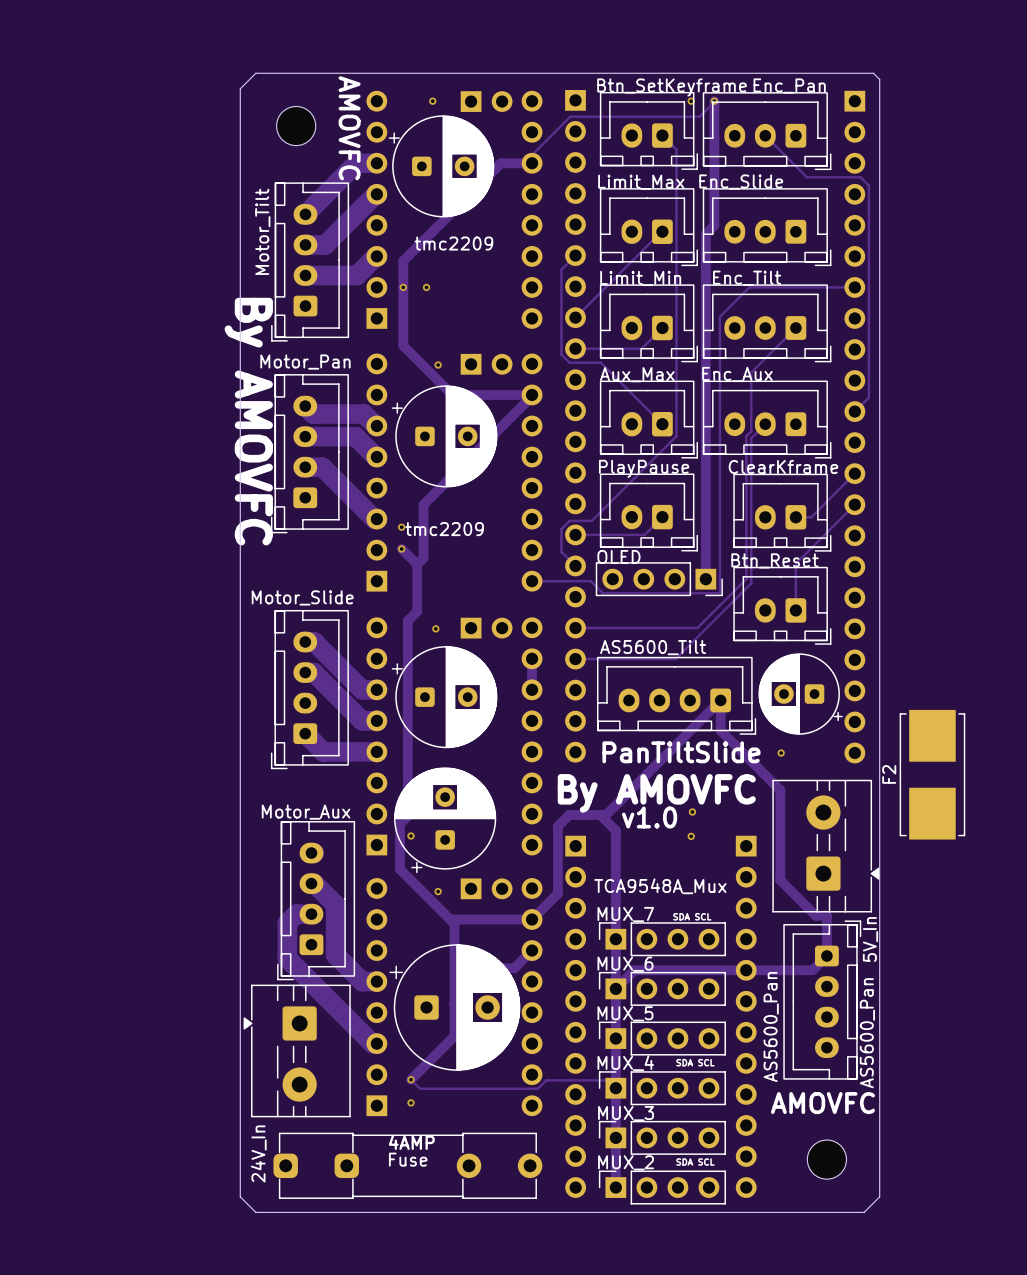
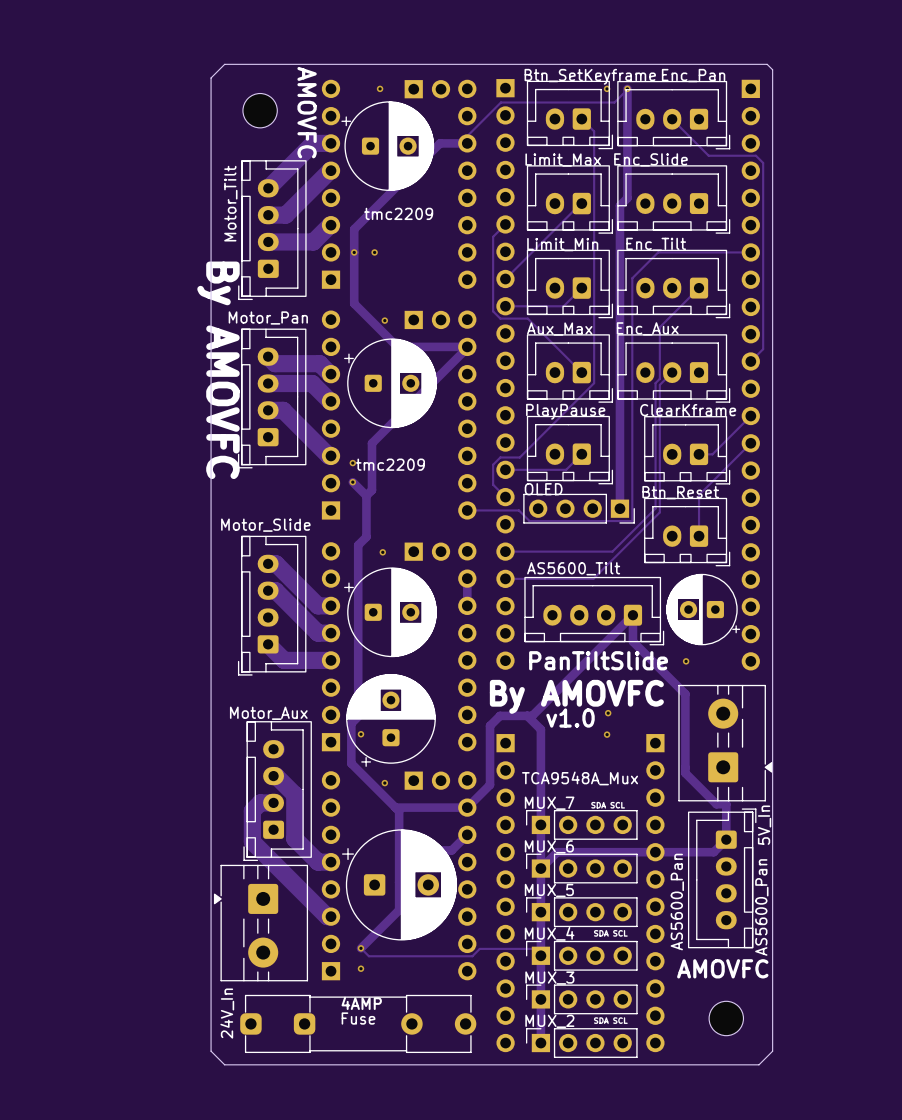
F2: (932, 774) -> none

